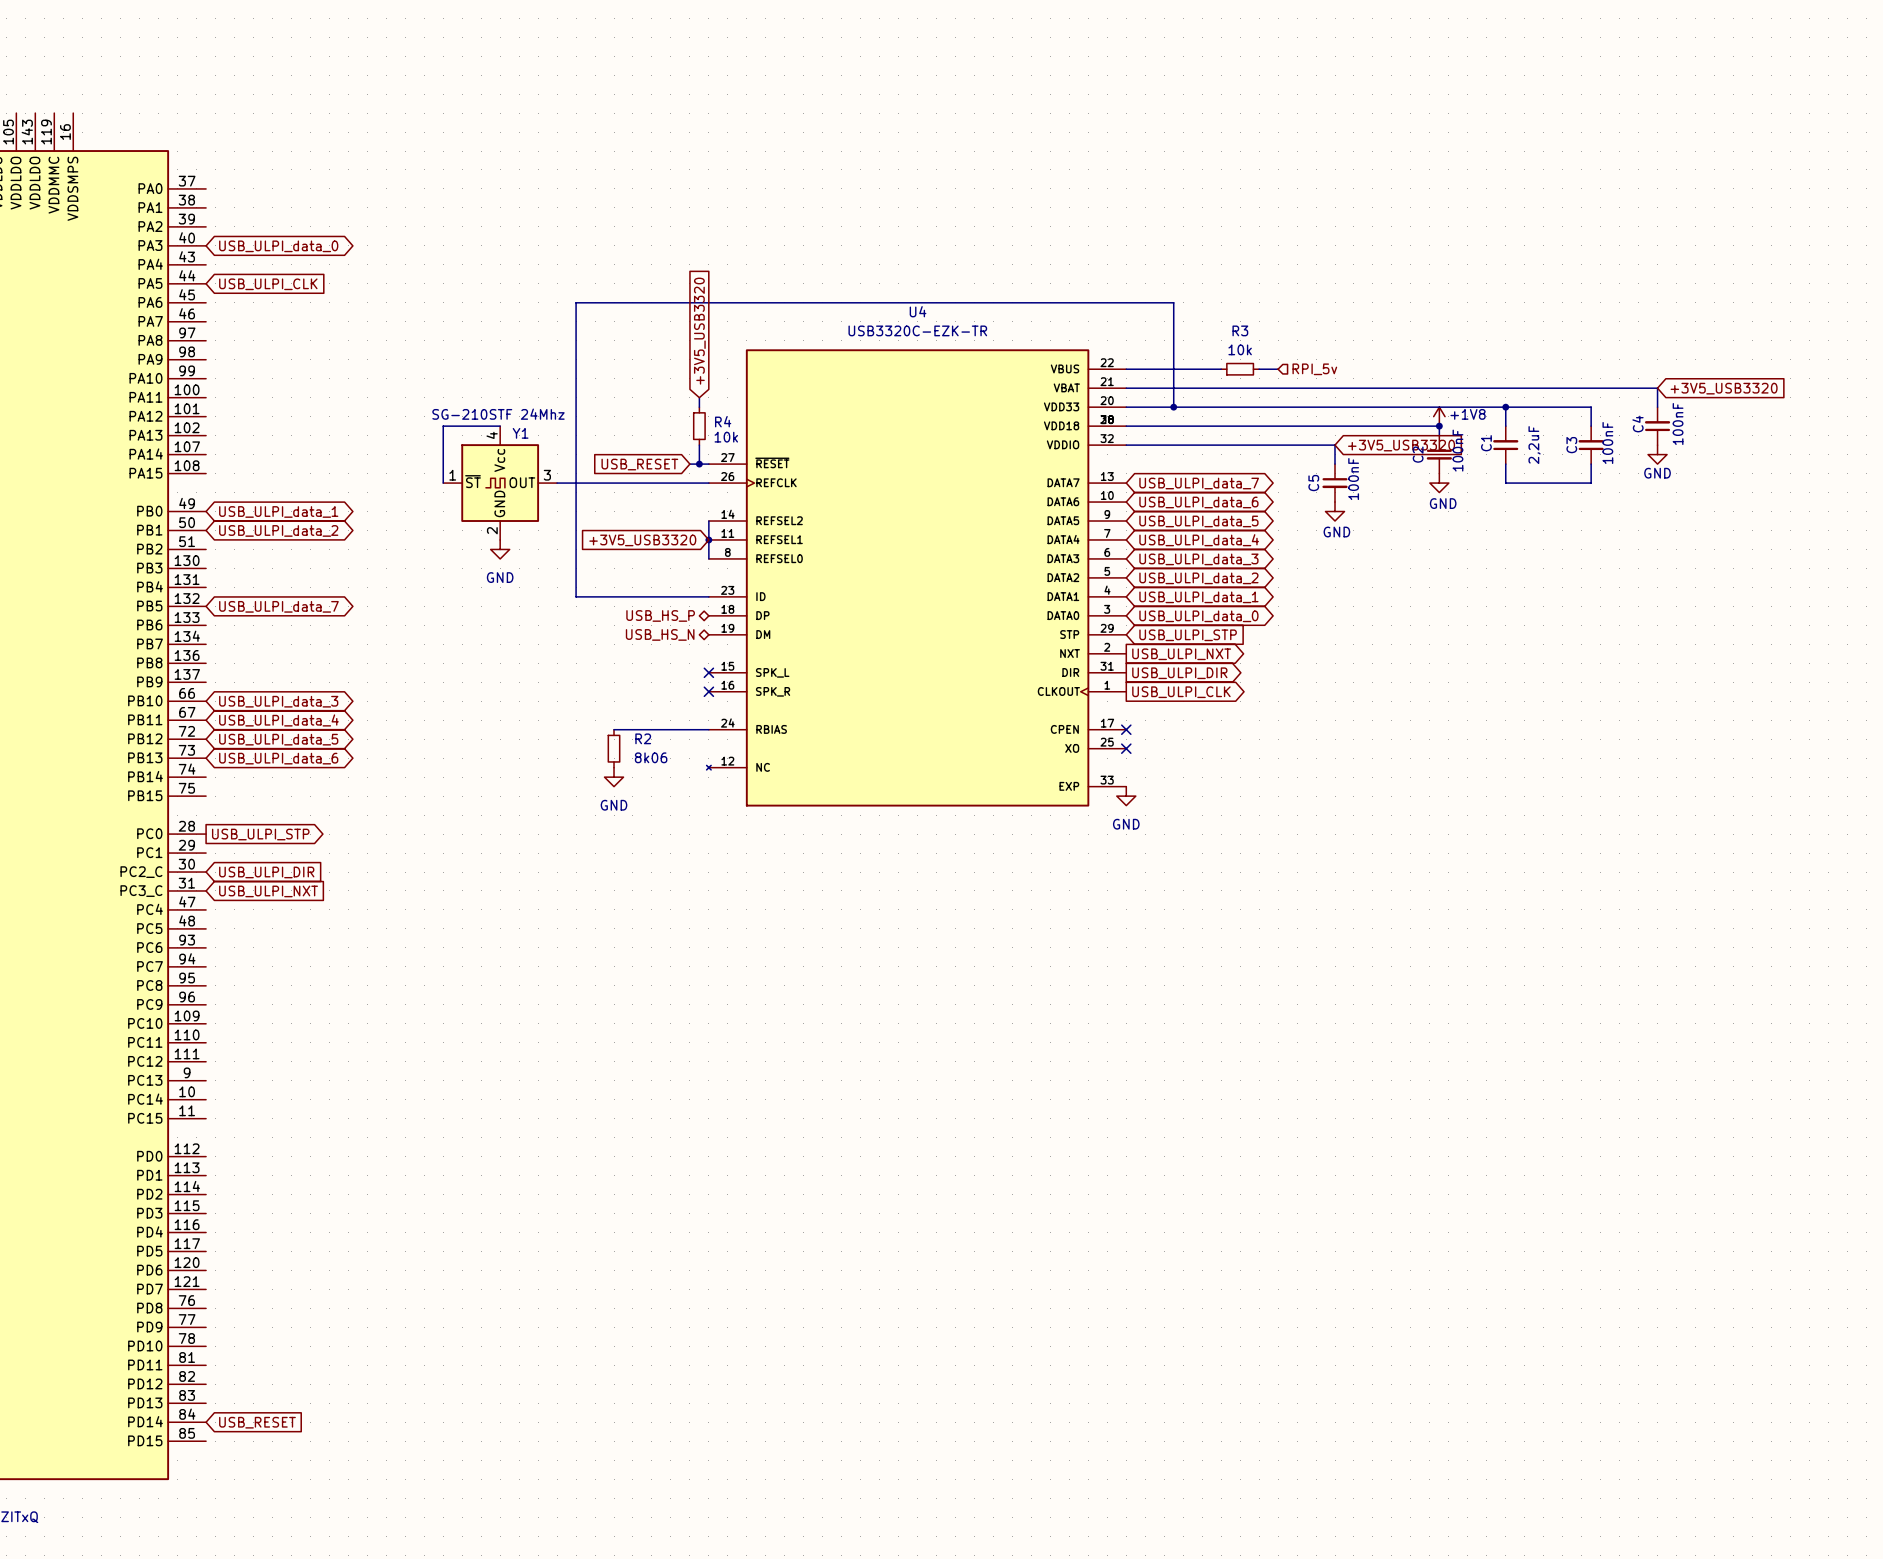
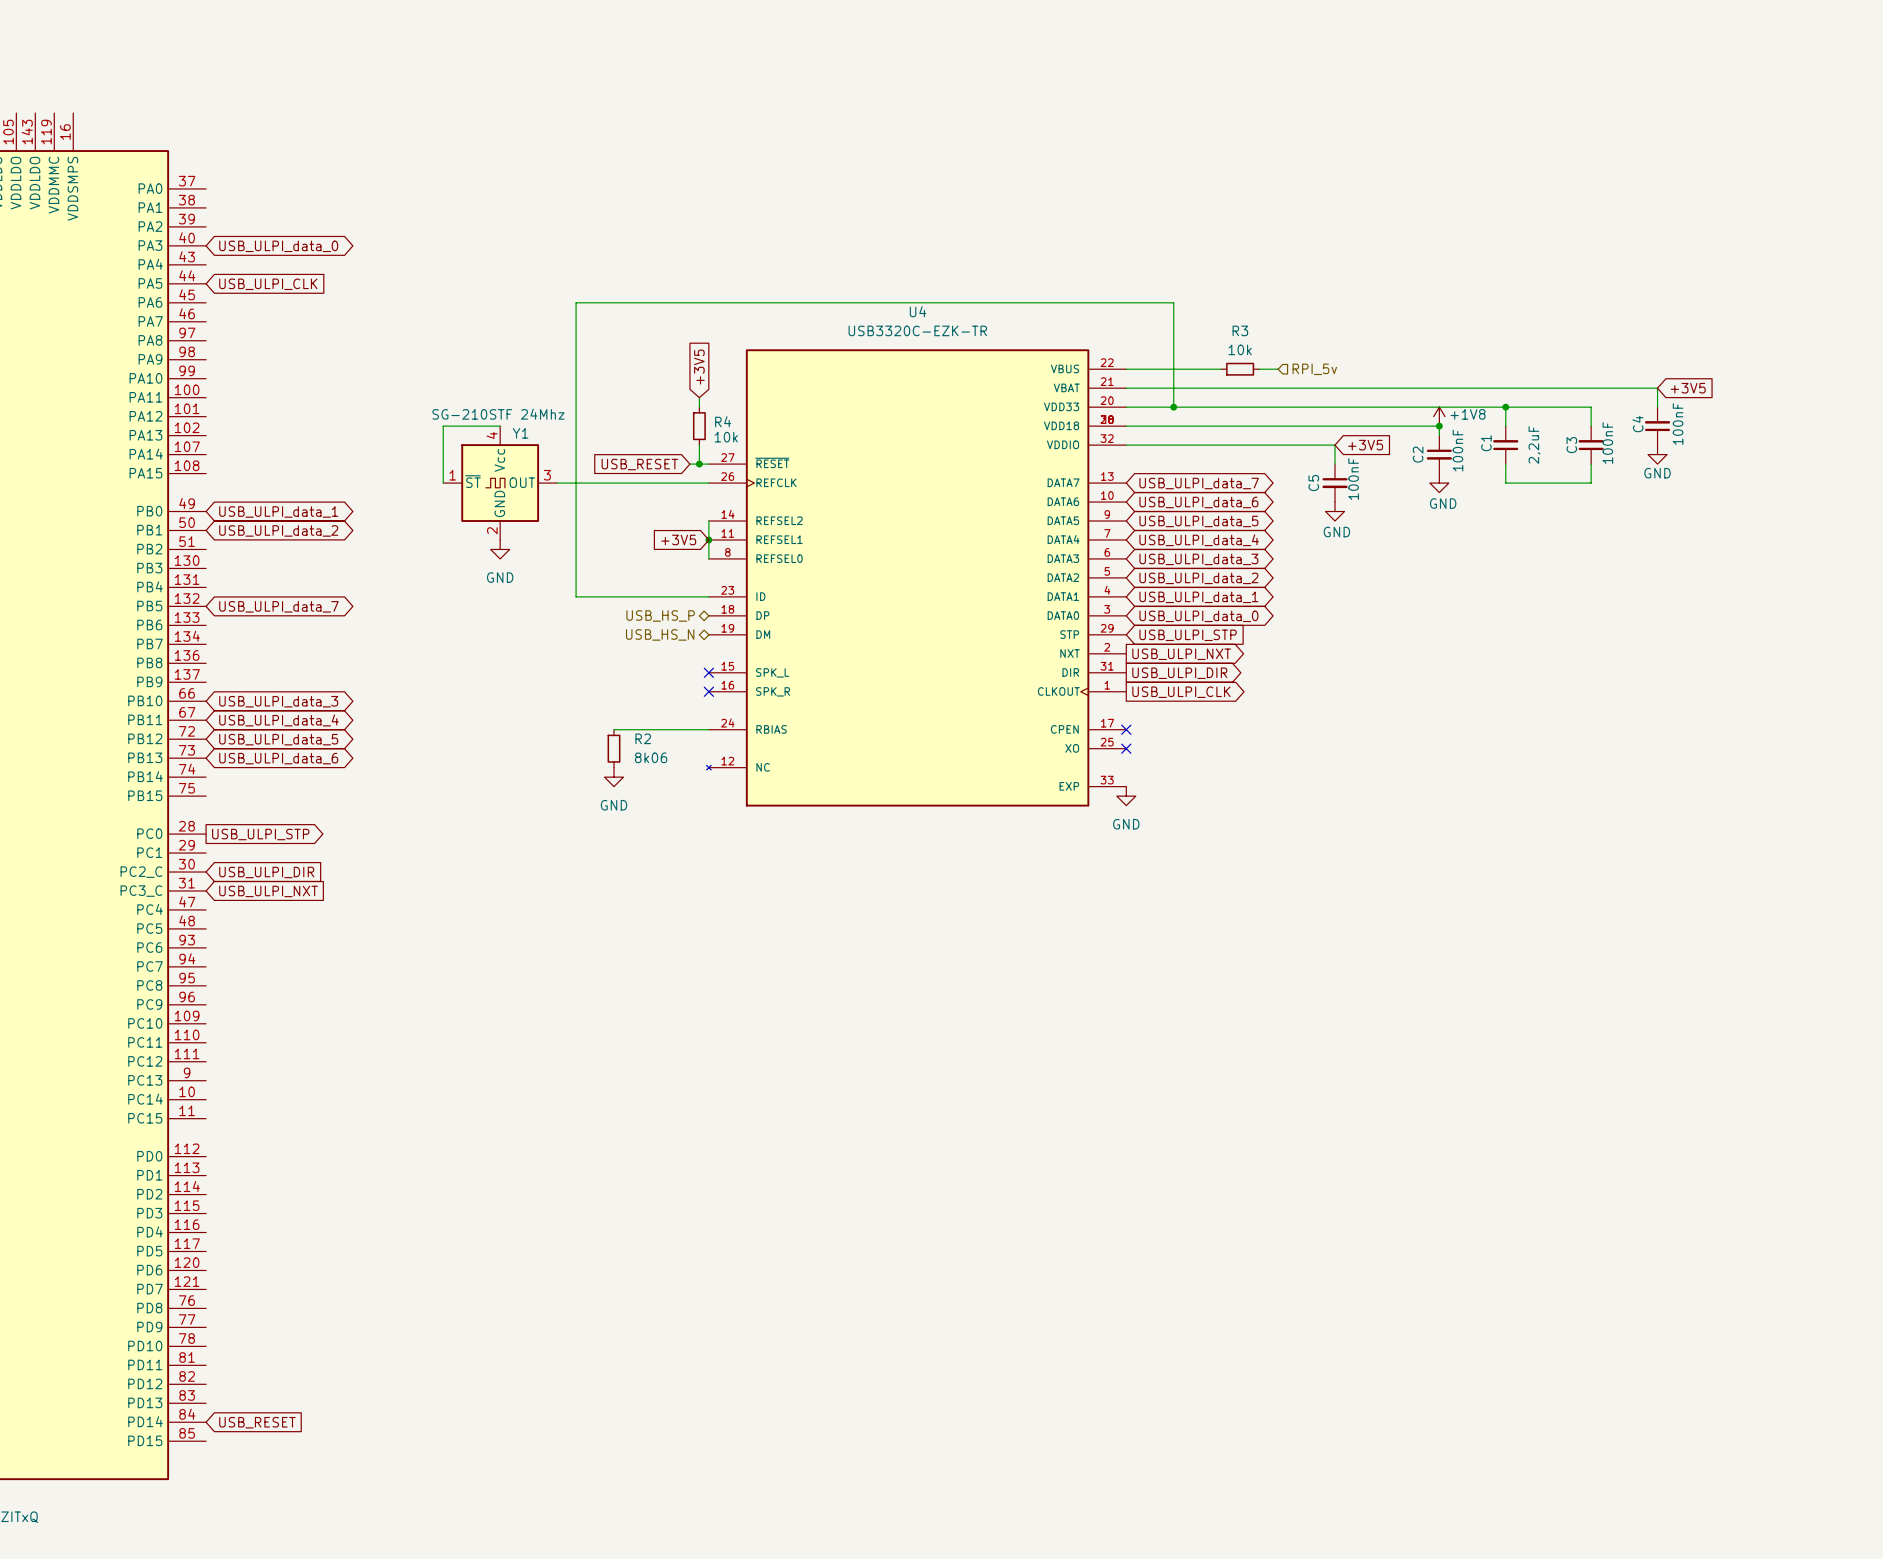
global label: +3V5_USB3320 (699, 331) -> +3V5 (699, 367)
global label: +3V5_USB3320 (1724, 388) -> +3V5 (1688, 388)
global label: +3V5_USB3320 (1401, 445) -> +3V5 (1365, 445)
global label: +3V5_USB3320 (642, 540) -> +3V5 (678, 539)

